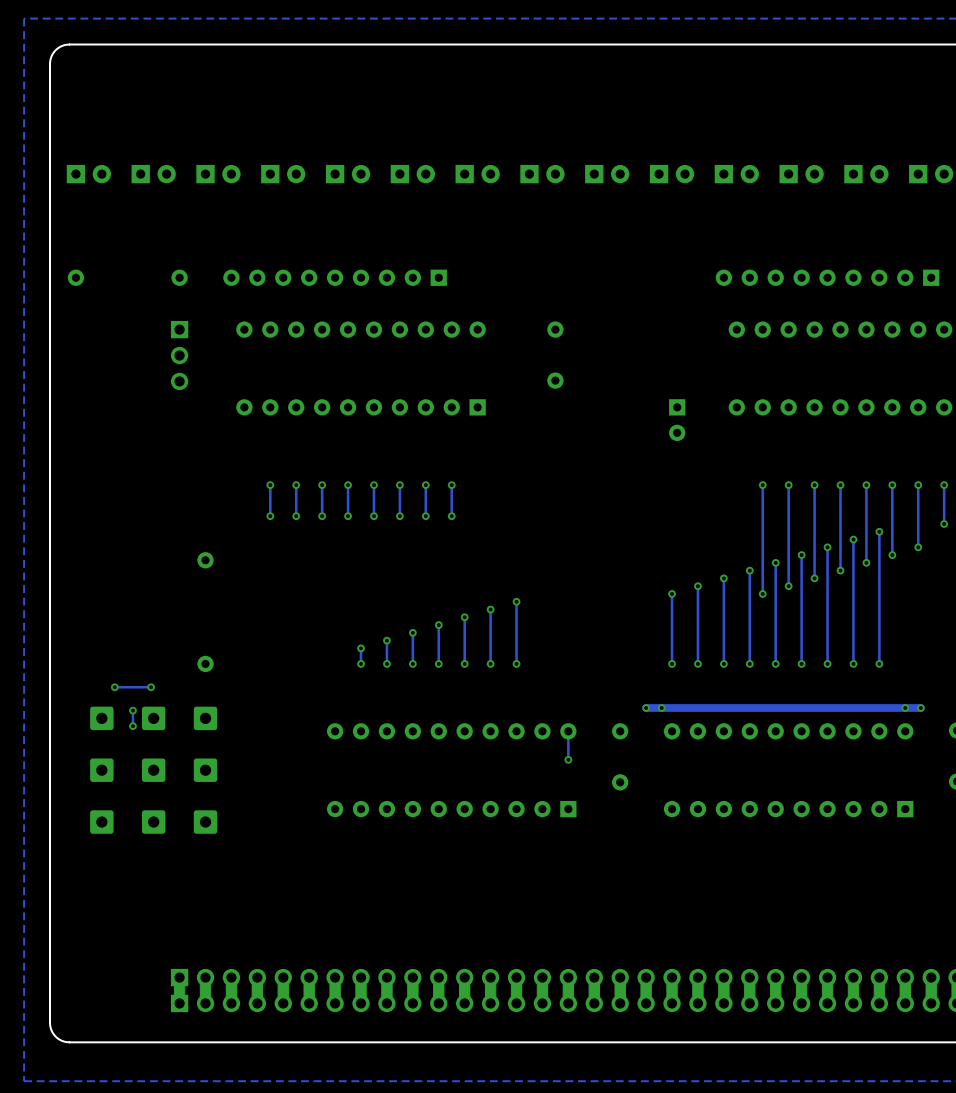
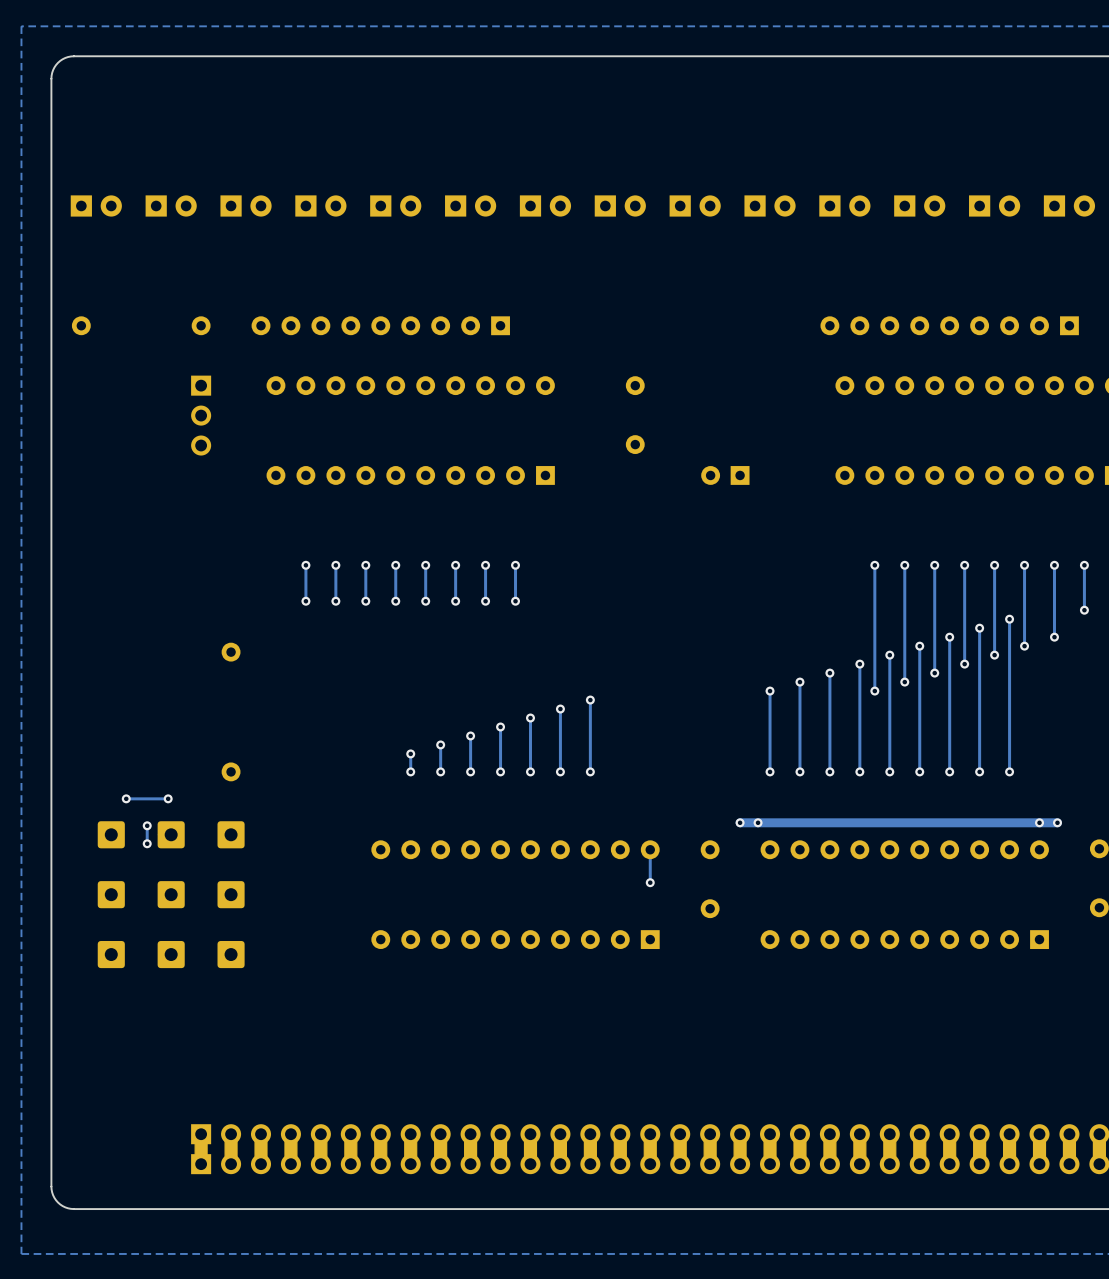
part rotation: 0° (677, 420) -> 90° clockwise (725, 475)
part position: (677, 420) -> (725, 475)

